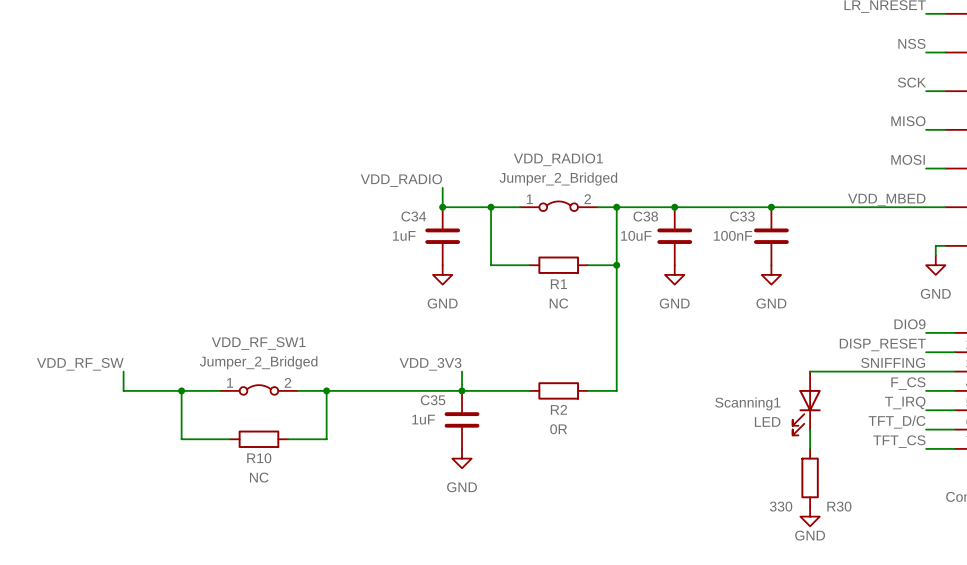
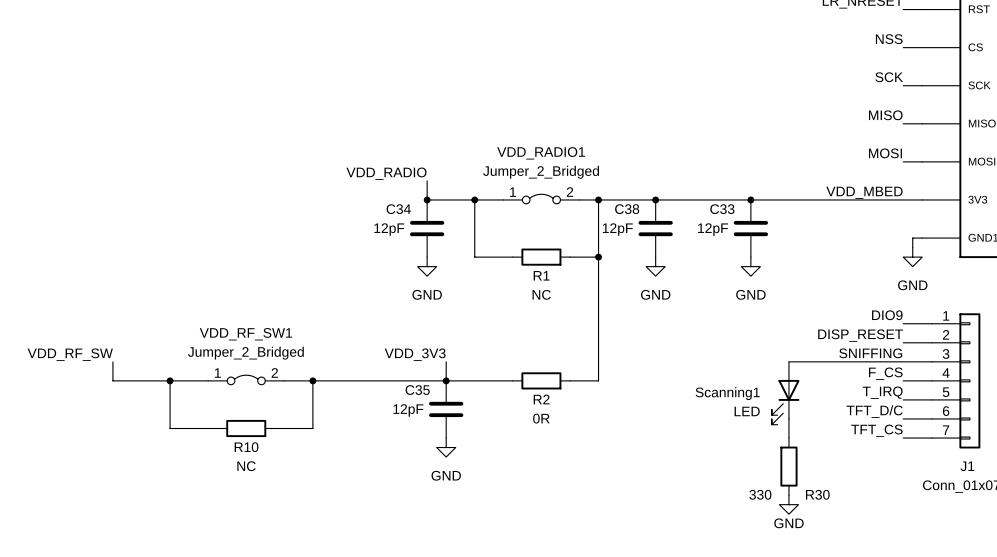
C34 value: 1uF (404, 235) -> 12pF (389, 229)
C38 value: 10uF (636, 235) -> 12pF (617, 229)
C33 value: 100nF (732, 235) -> 12pF (713, 229)
C35 value: 1uF (423, 419) -> 12pF (408, 410)

